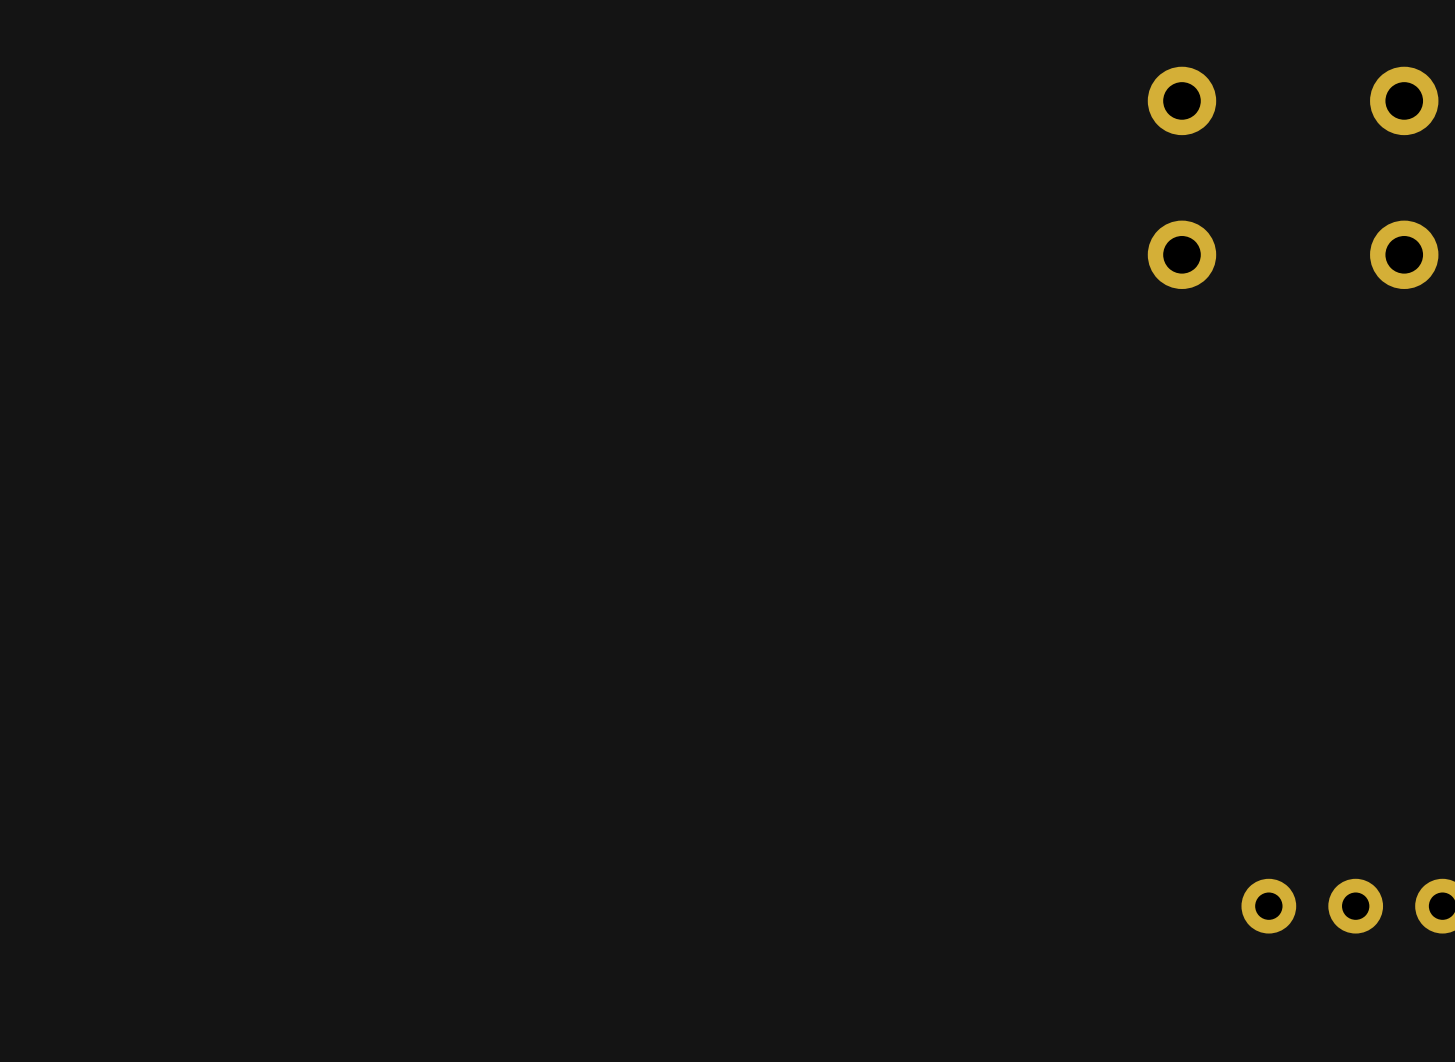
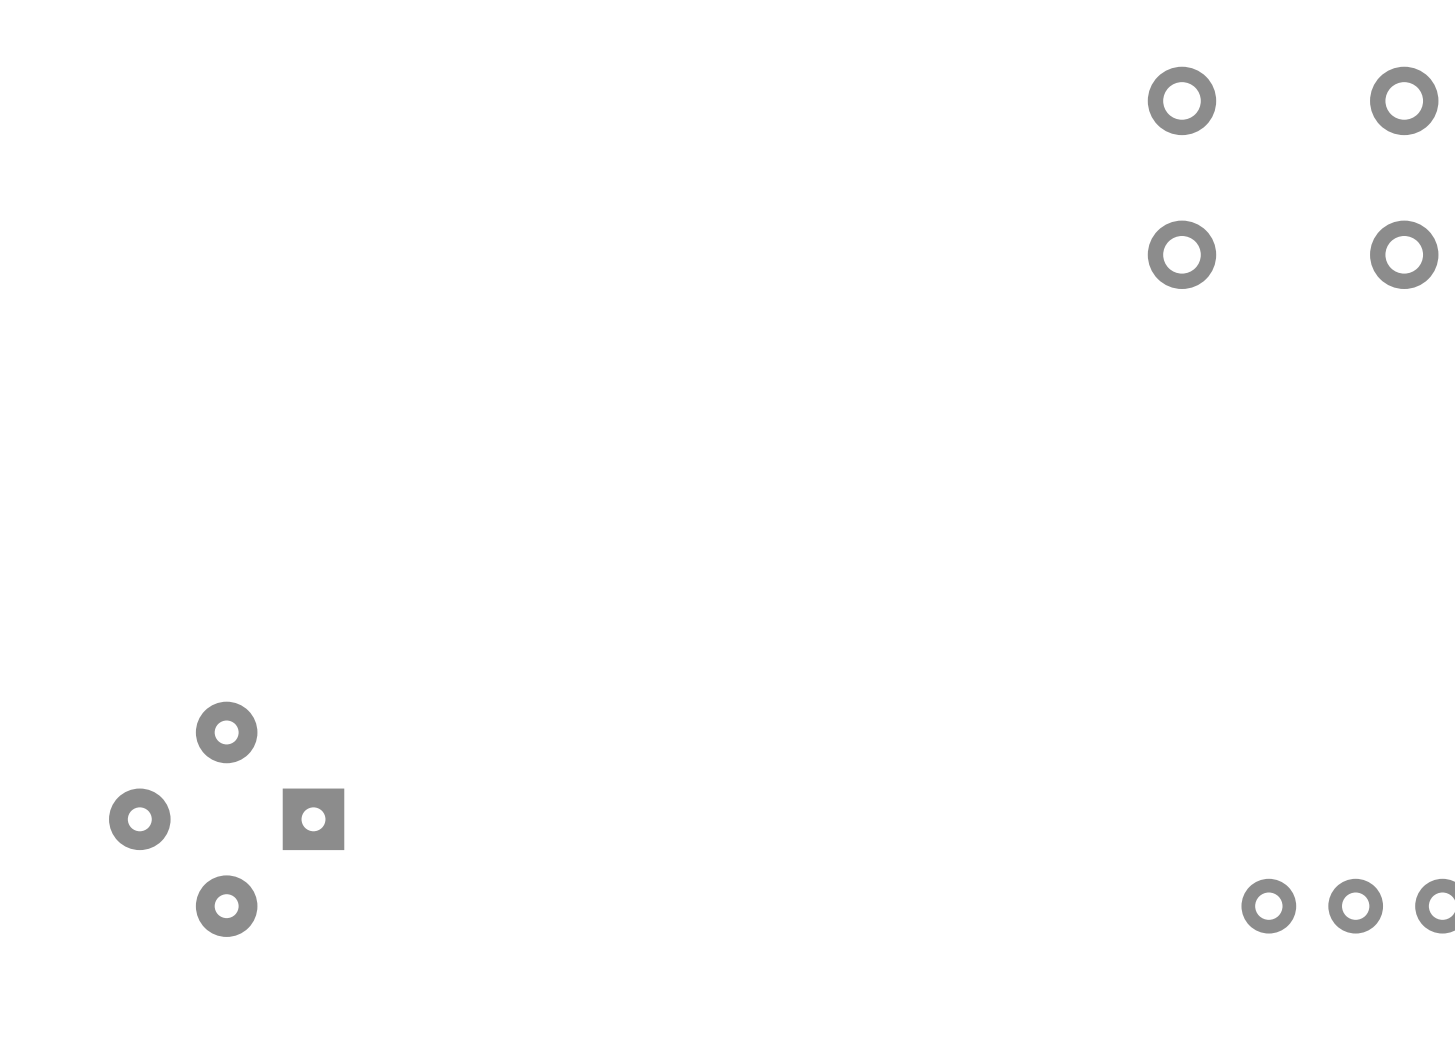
part: none -> (226, 819)

